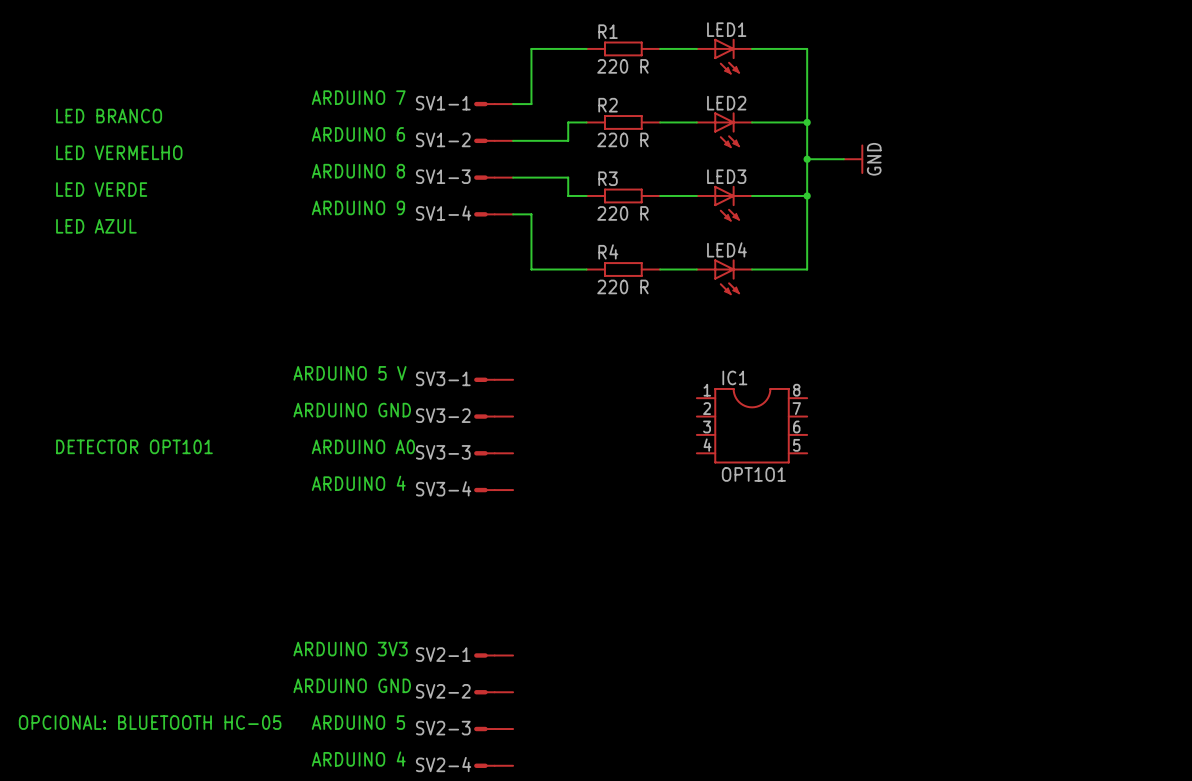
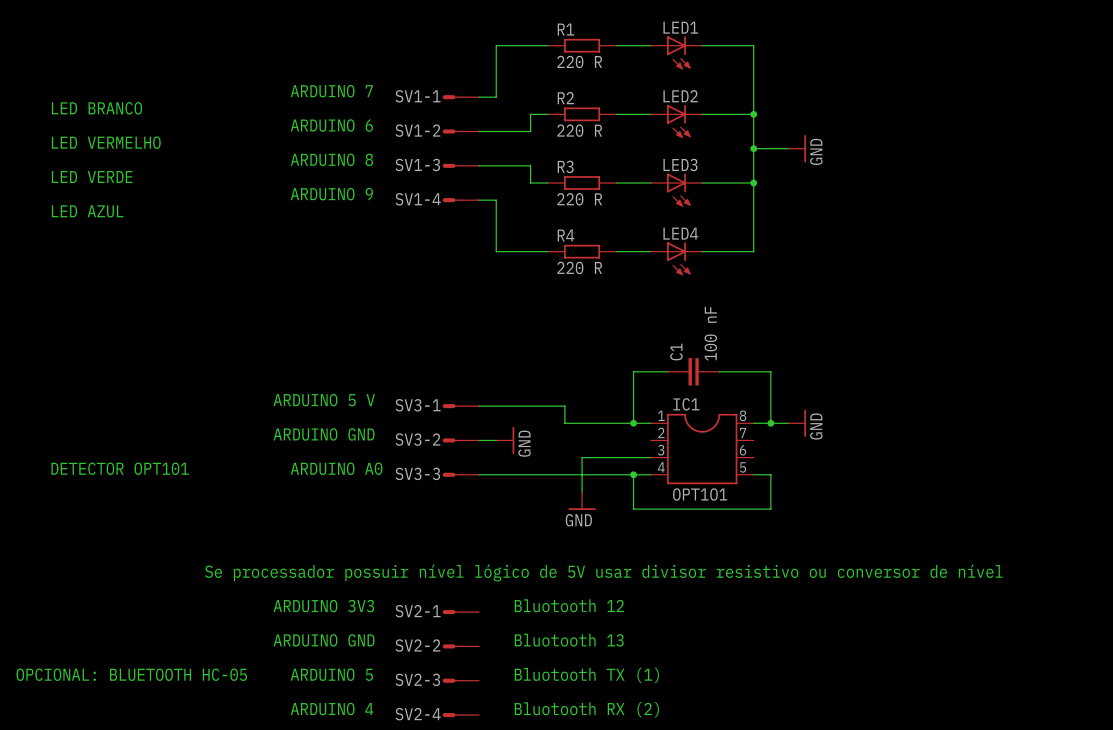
text position: ARDUINO 5 V (349, 373) -> ARDUINO 5 V (324, 400)
SV3-1 position: (493, 379) -> (460, 406)
wire: none -> (667, 371) (633, 371) (633, 423)
C1: none -> 100 nF (693, 371)
wire: none -> (719, 371) (770, 371) (770, 423)
text position: ARDUINO GND (352, 410) -> ARDUINO GND (324, 434)
SV3-2 position: (493, 416) -> (460, 440)
IC1 position: (752, 425) -> (702, 449)
wire: none -> (479, 406) (564, 406) (564, 423) (650, 423)
text position: DETECTOR OPT101 (134, 446) -> DETECTOR OPT101 (120, 468)
text position: ARDUINO A0 (363, 446) -> ARDUINO A0 (336, 468)
SV3-3 position: (493, 453) -> (460, 474)
junction: none -> (633, 423)
wire: none -> (753, 423) (788, 423)
junction: none -> (770, 423)
power symbol: none -> GND (797, 423)
wire: none -> (479, 440) (496, 440)
power symbol: none -> GND (505, 440)
text: ARDUINO 4 (358, 483) -> none
SV3-4: (493, 490) -> none
wire: none -> (650, 457) (582, 457) (582, 491)
wire: none -> (479, 474) (650, 474)
wire: none -> (633, 474) (633, 509) (770, 509) (770, 474) (753, 474)
junction: none -> (633, 474)
power symbol: none -> GND (582, 500)
text: none -> Se processador possuir nível lógico de 5V usar divisor resistivo ou conversor de nível (603, 572)
text: none -> Bluotooth 12 (569, 605)
text: none -> Bluotooth 13 (569, 640)
text: none -> Bluotooth TX (1) (586, 675)
text: none -> Bluotooth RX (2) (586, 709)

